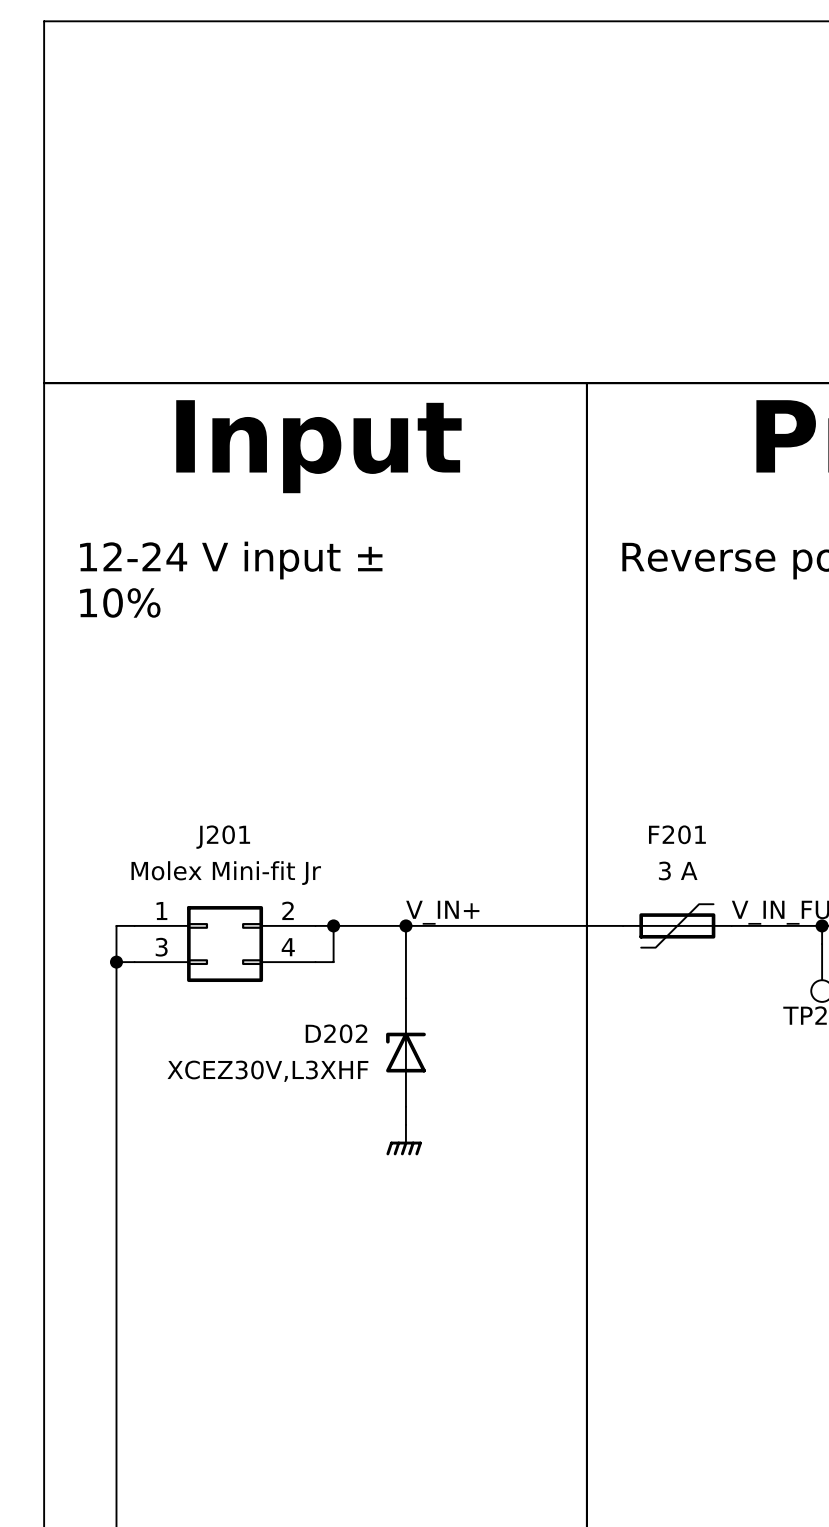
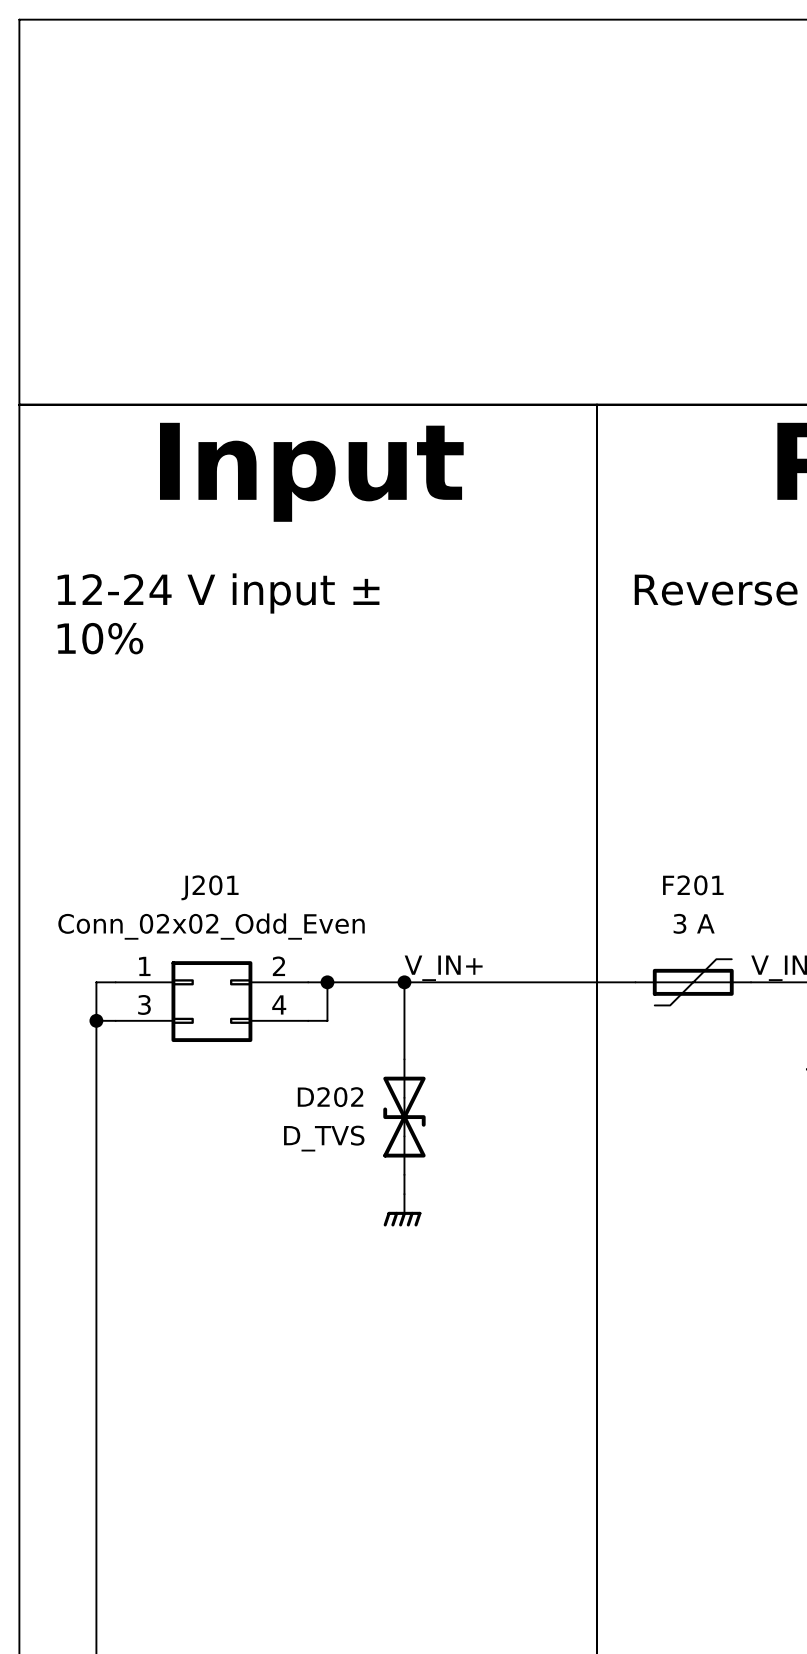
J201 value: Molex Mini-fit Jr (226, 873) -> Conn_02x02_Odd_Even (211, 926)
D202 symbol: [386, 998, 426, 1107] -> [383, 1059, 426, 1175]
D202 value: XCEZ30V,L3XHF (267, 1071) -> D_TVS (324, 1138)

